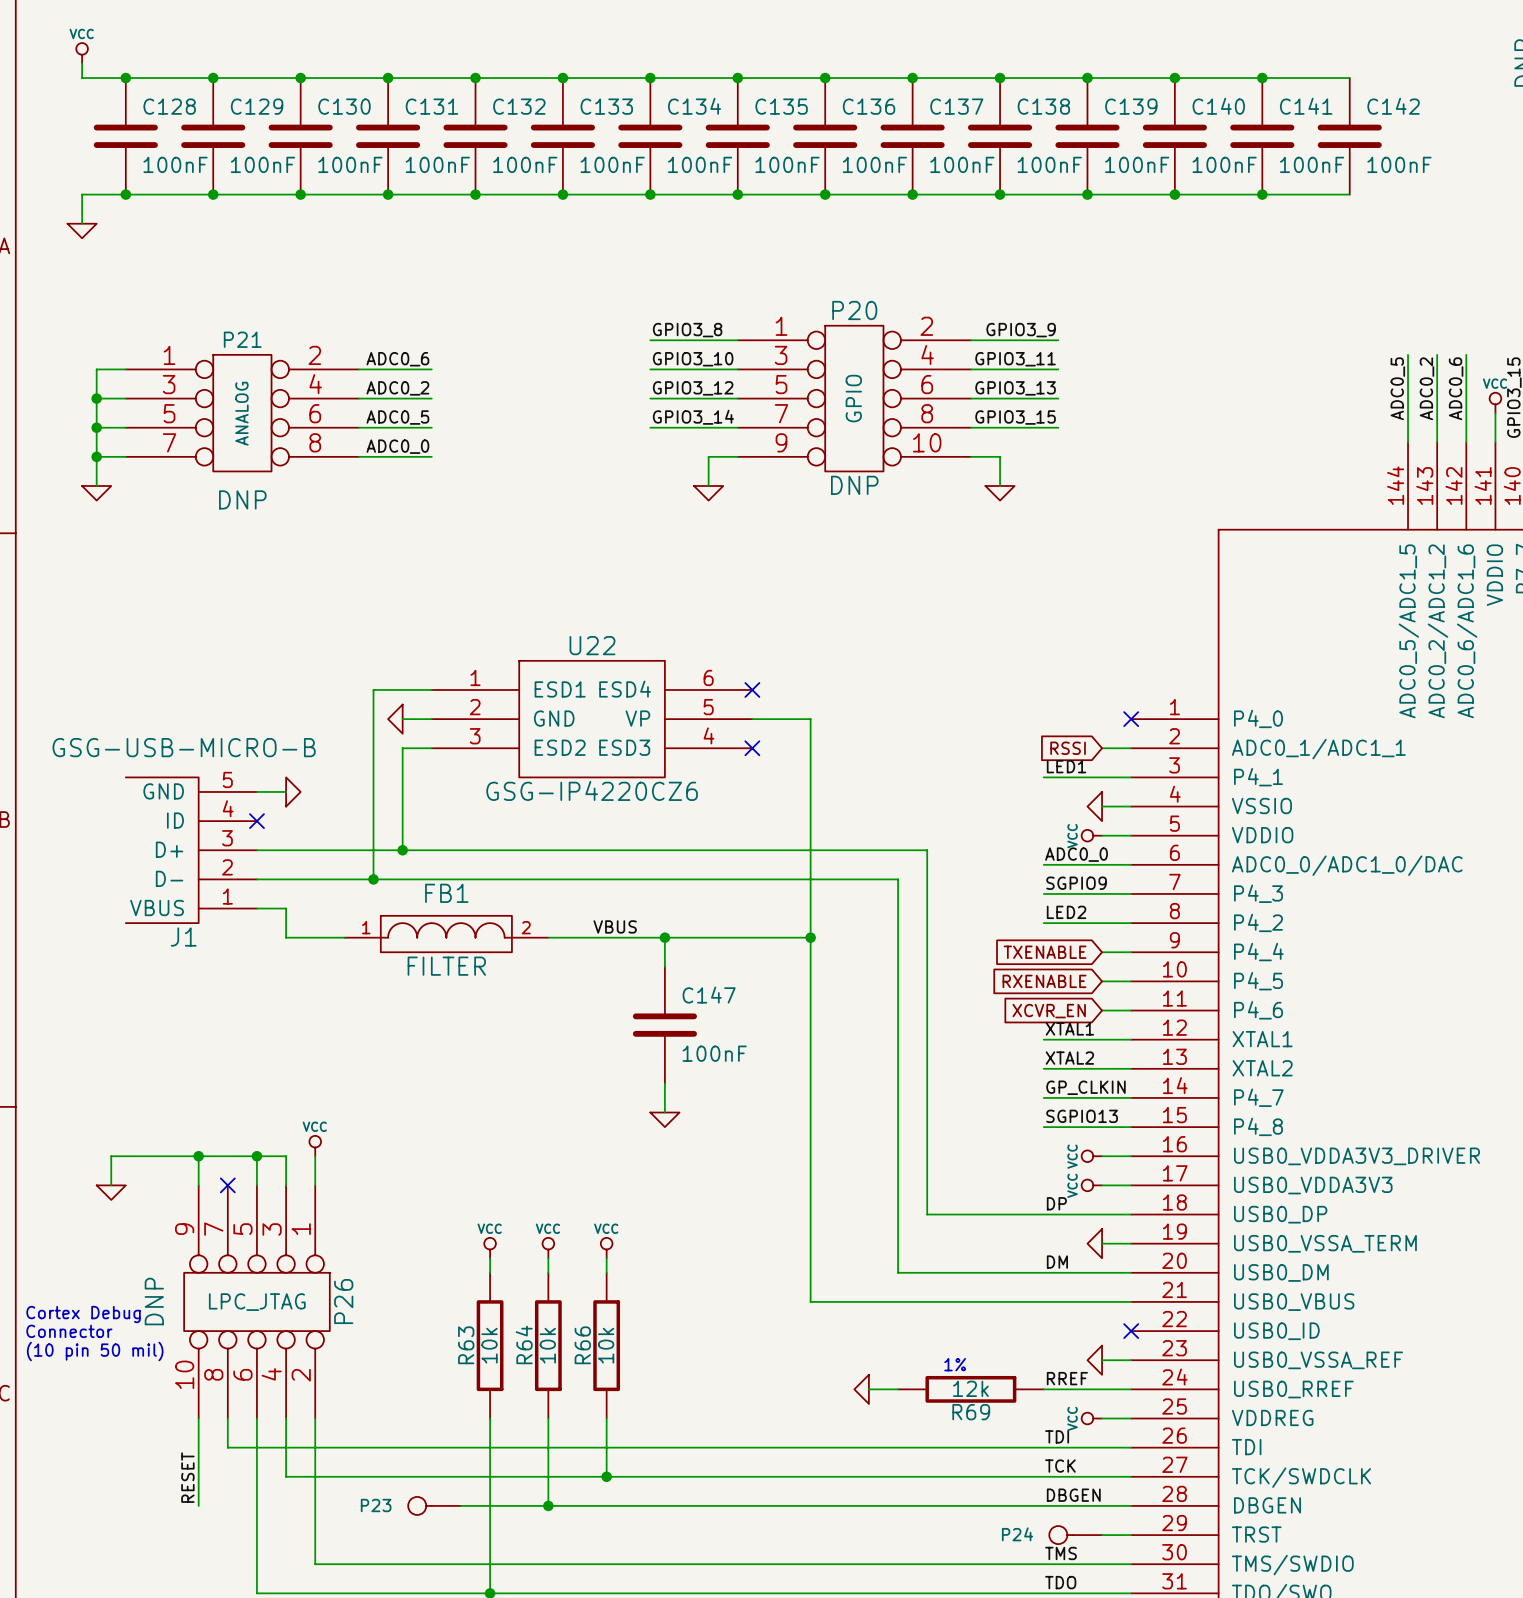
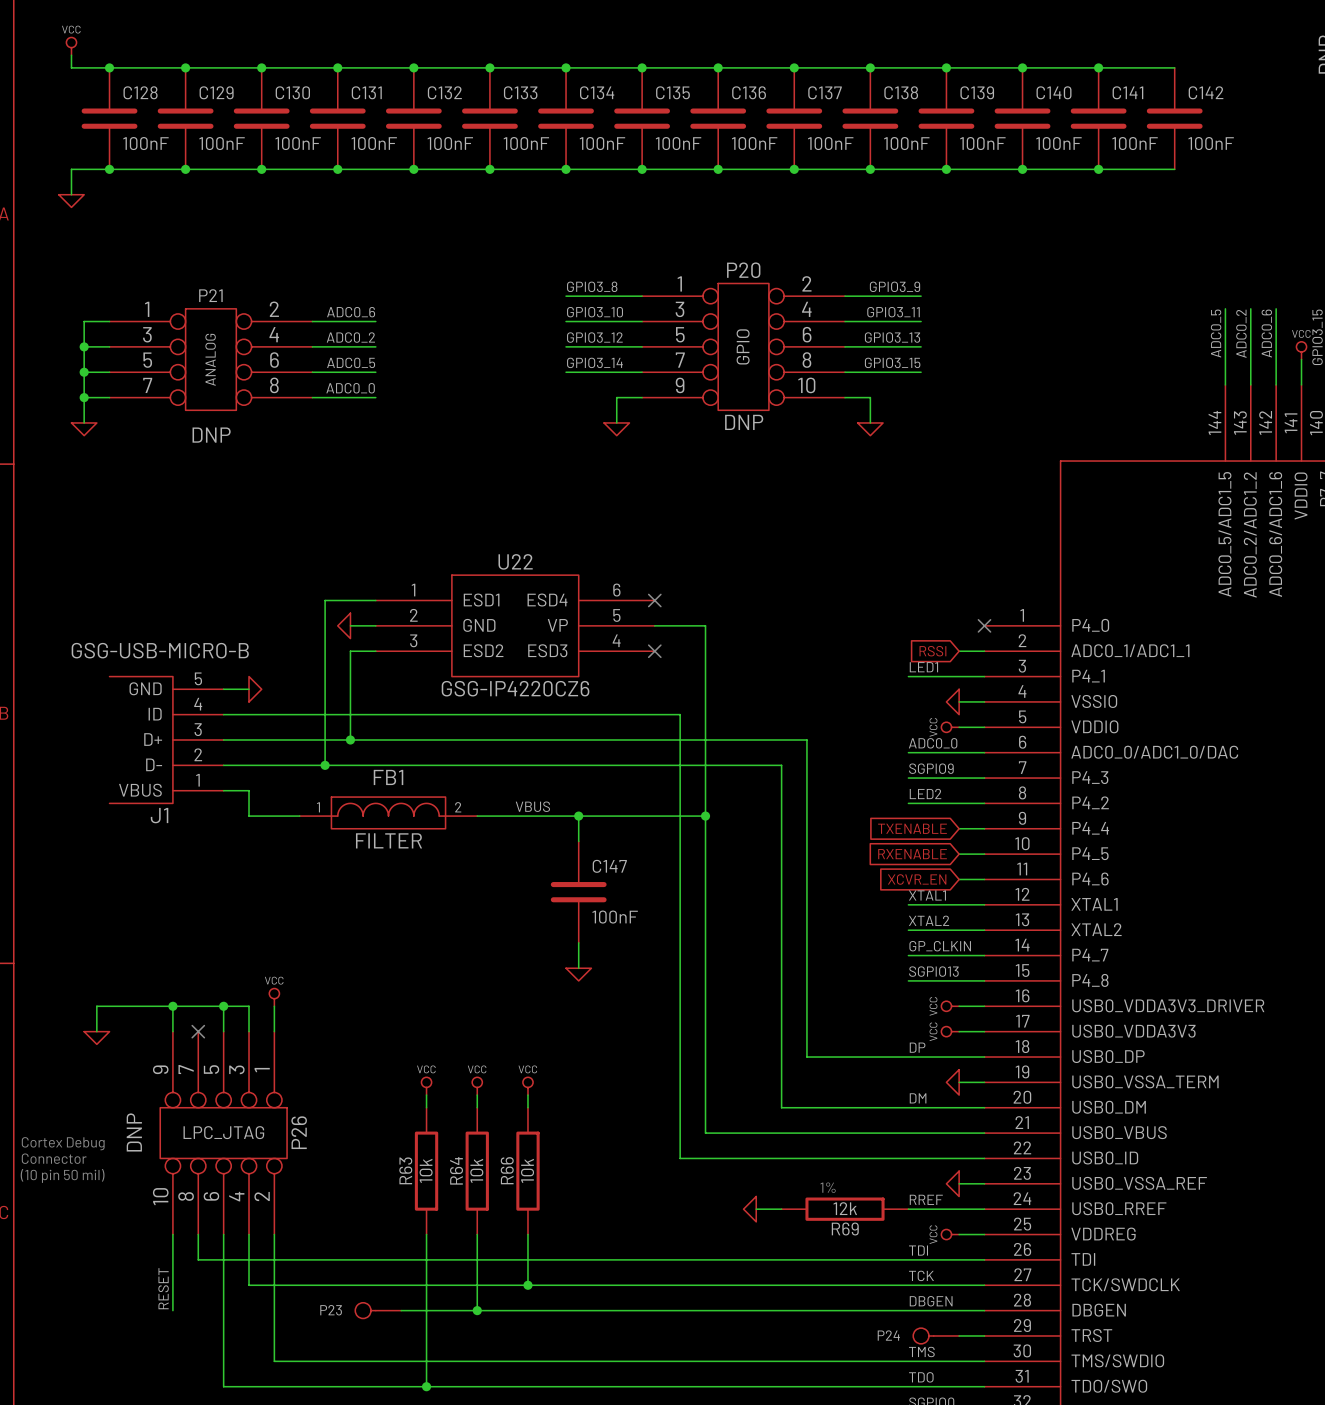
wire: none -> (223, 714) (680, 714) (680, 1158) (984, 1158)
no-connect mark: (256, 821) -> none
no-connect mark: (1131, 1331) -> none

